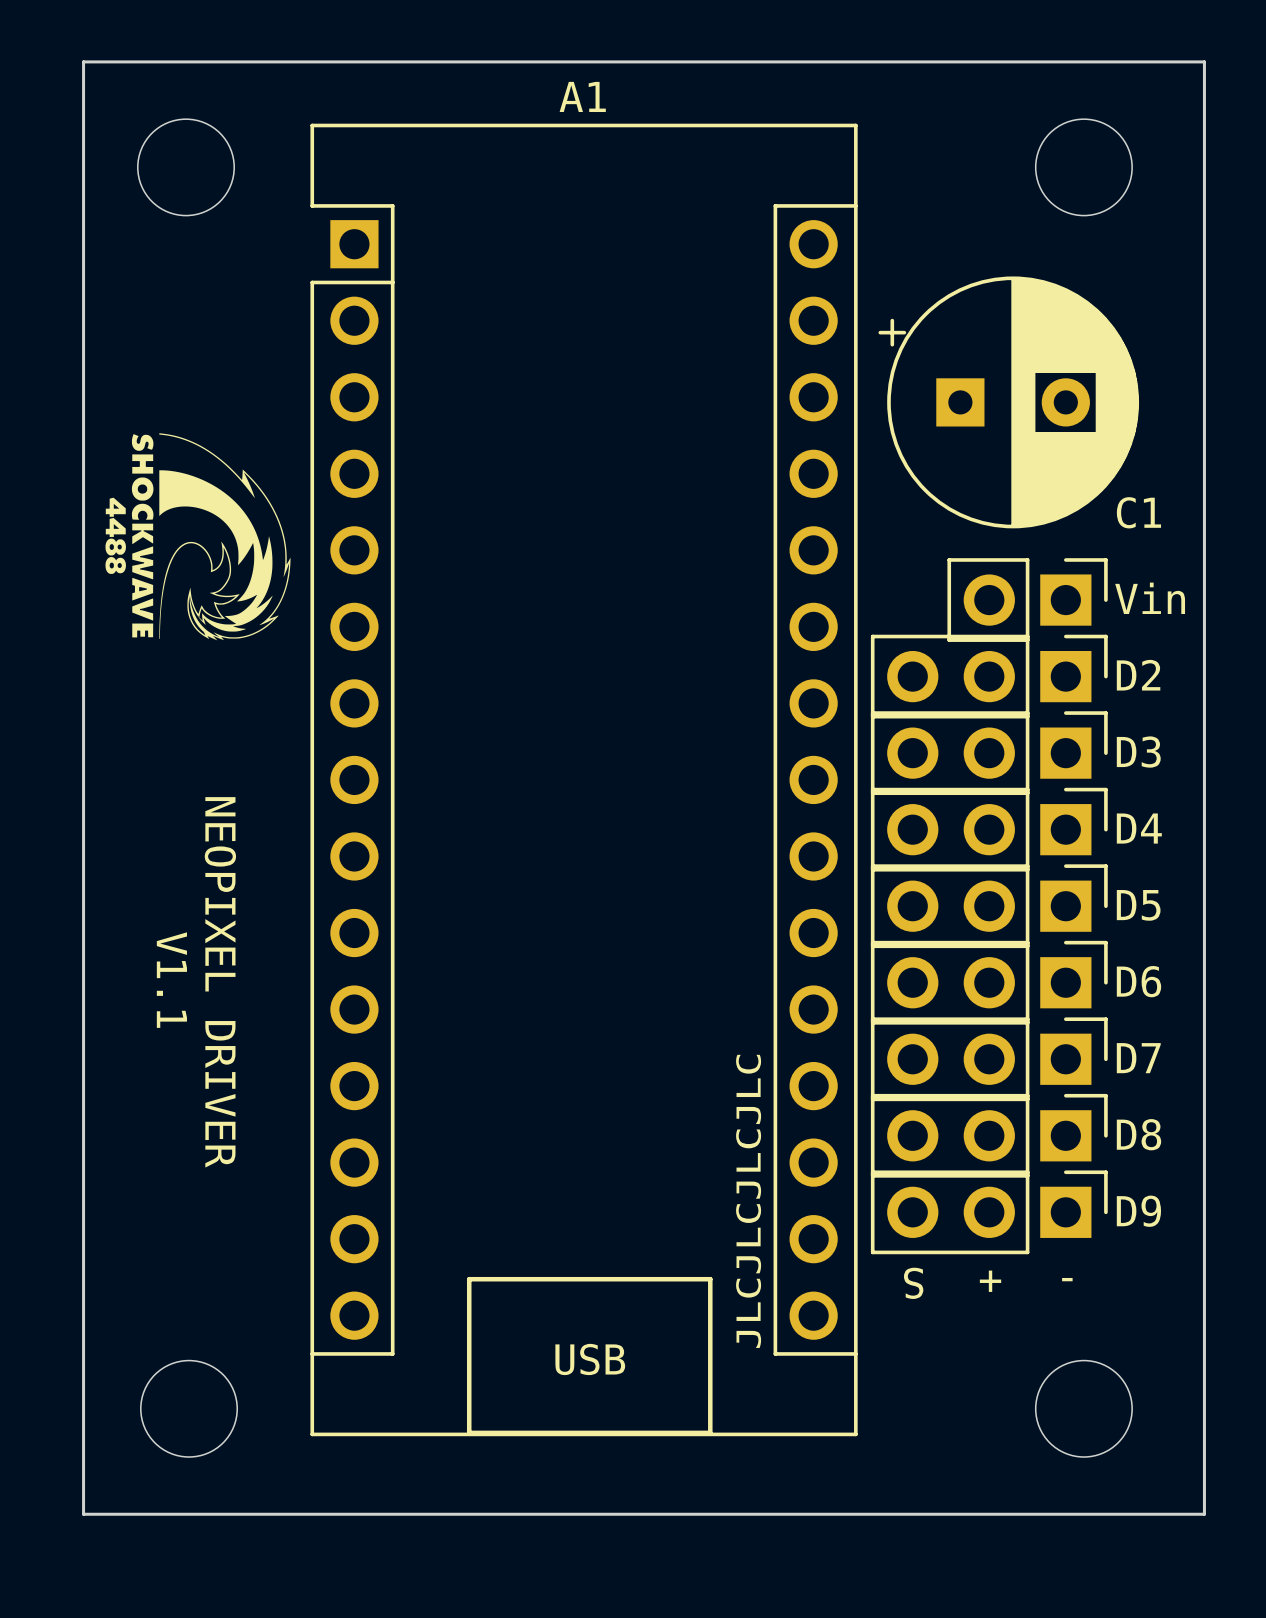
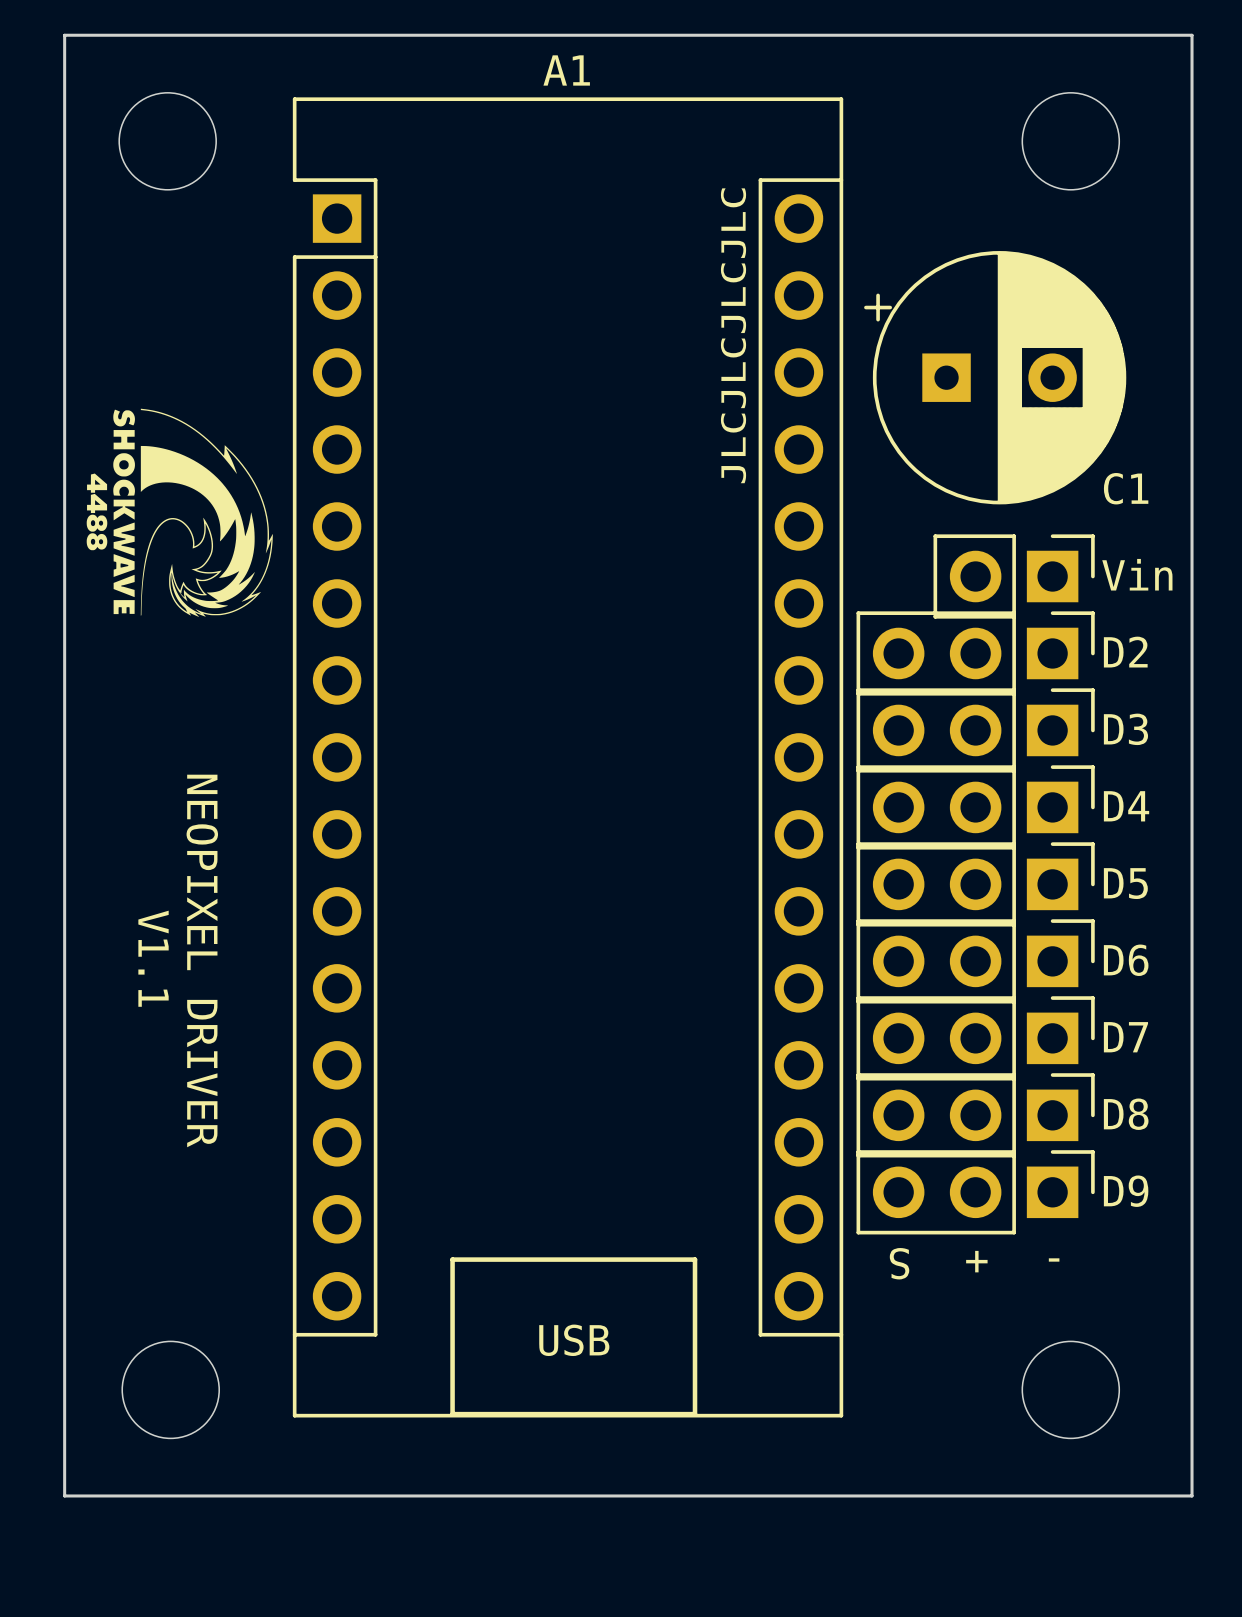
text: none -> JLCJLCJLCJLC (733, 335)
text: JLCJLCJLCJLC (748, 1201) -> none

